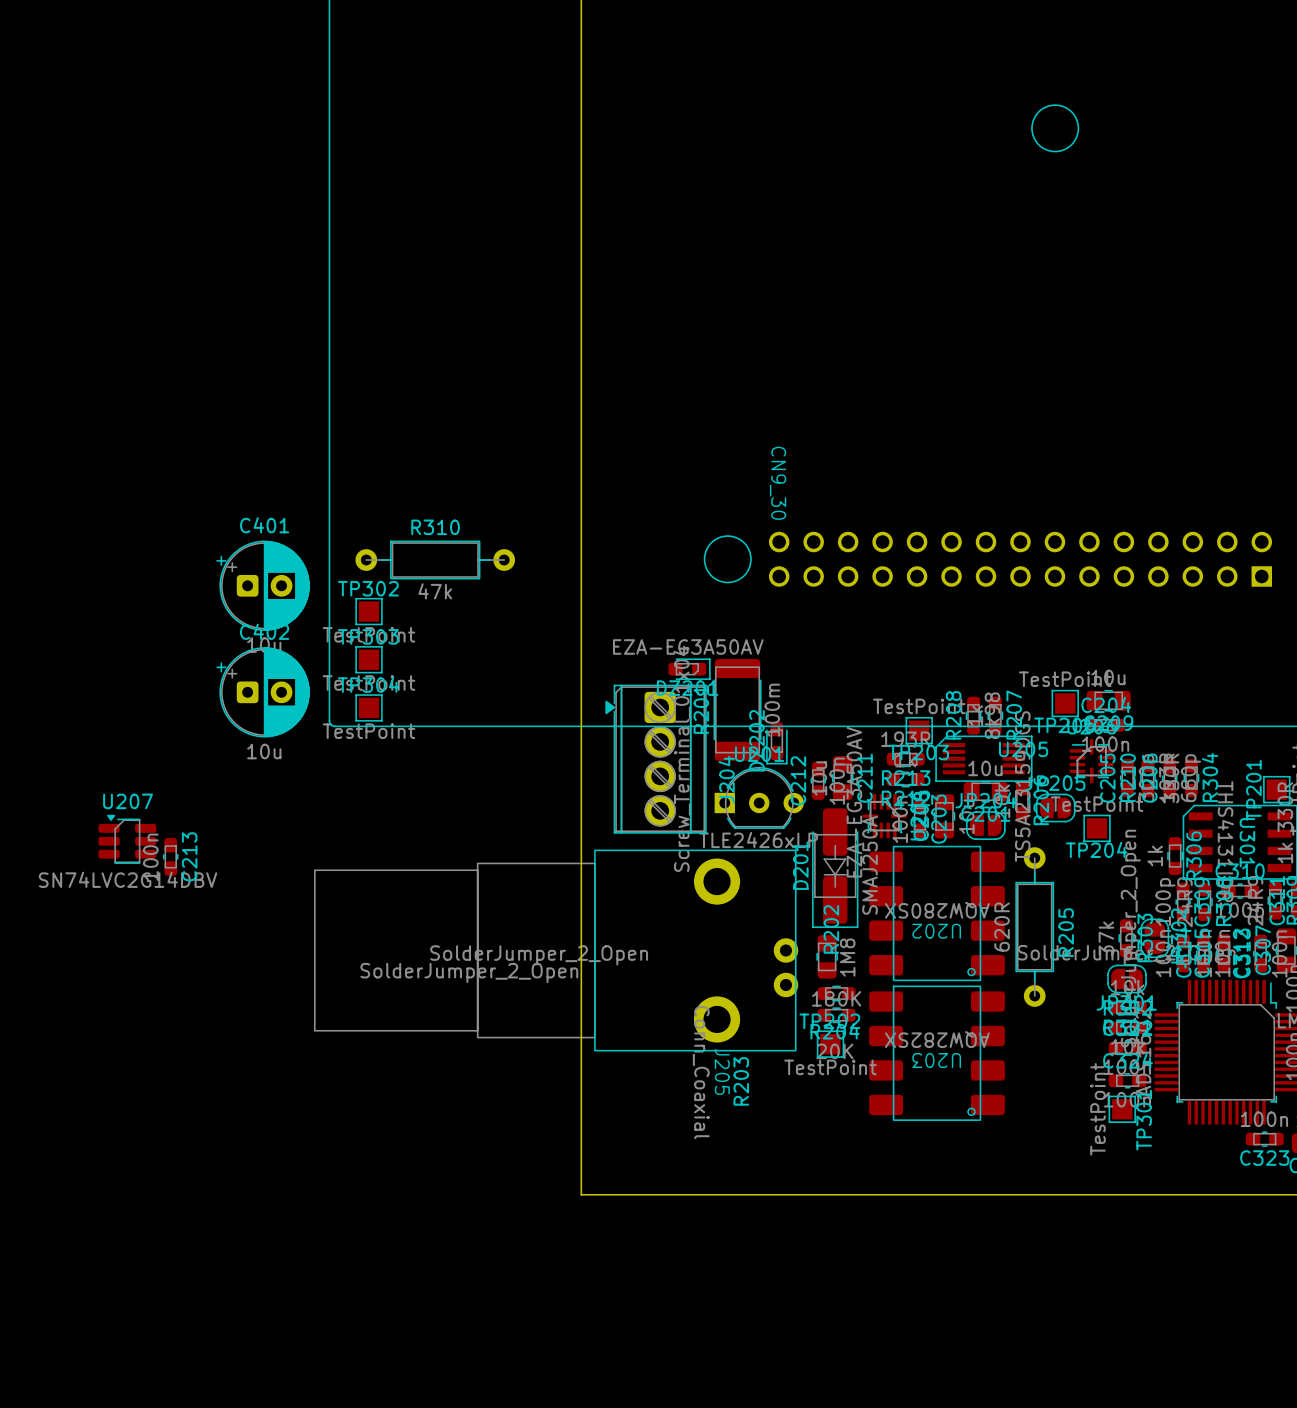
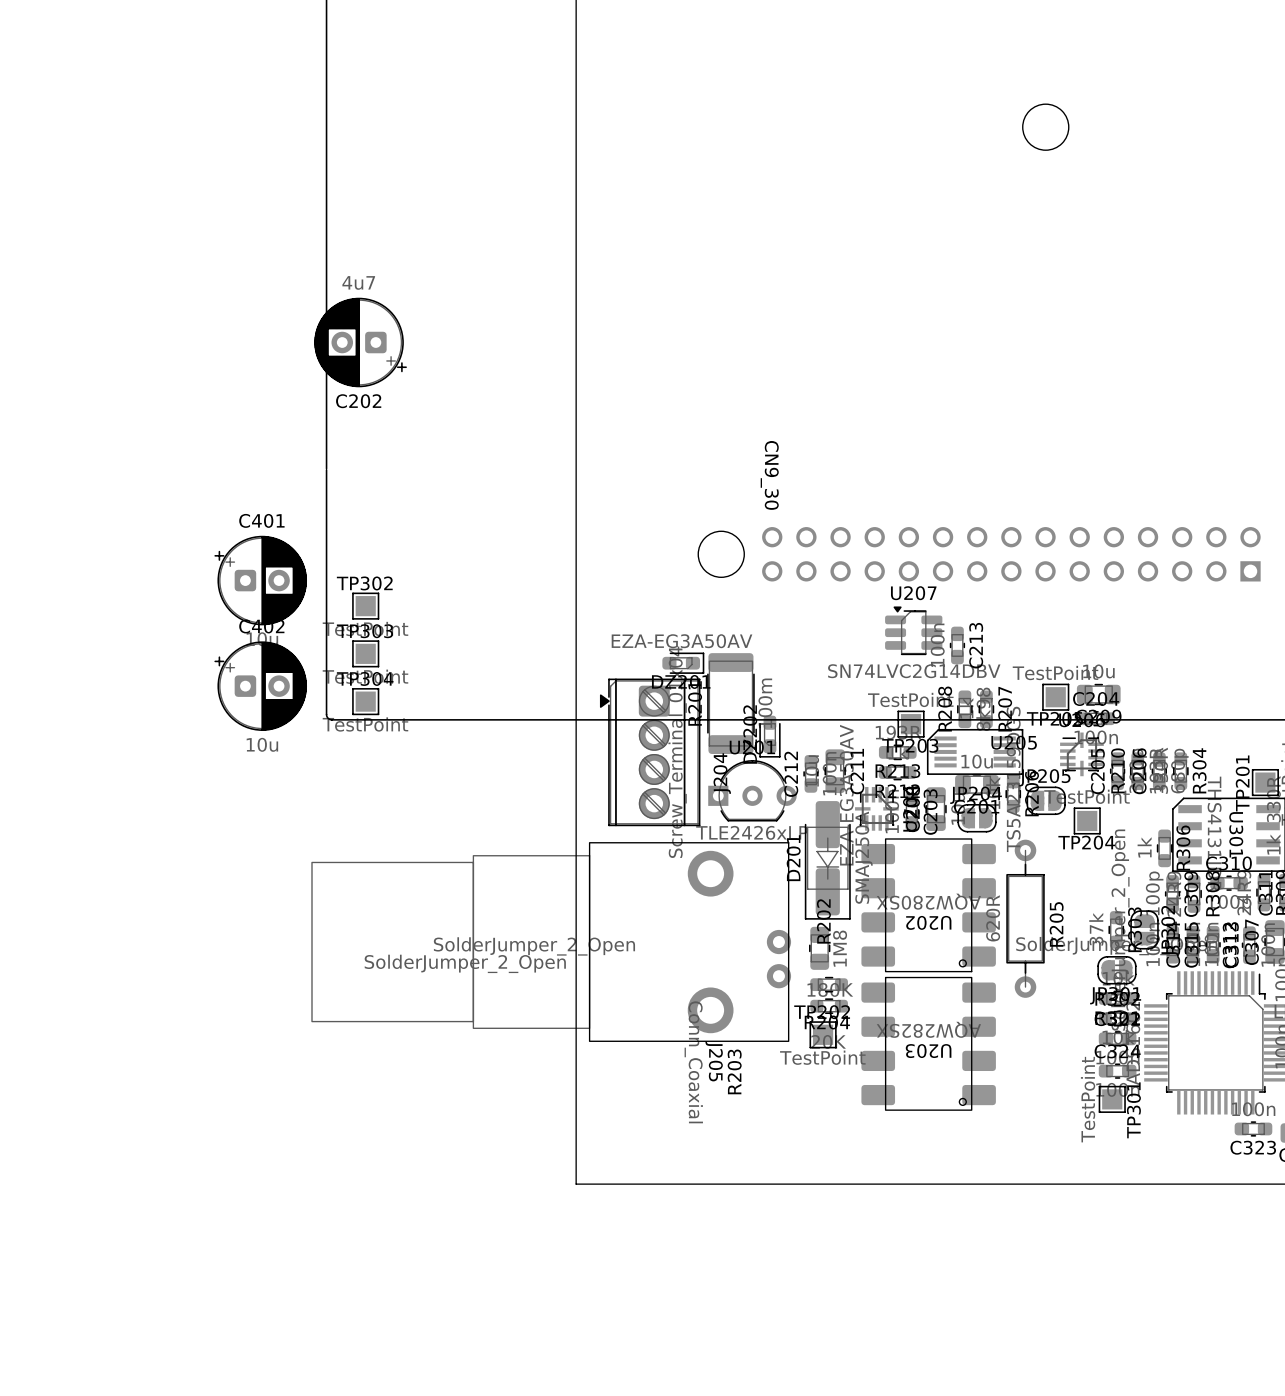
C202: none -> 4u7 (360, 342)
R310: 47k (435, 560) -> none
U207 position: (127, 839) -> (913, 630)
C213 position: (170, 856) -> (957, 645)

